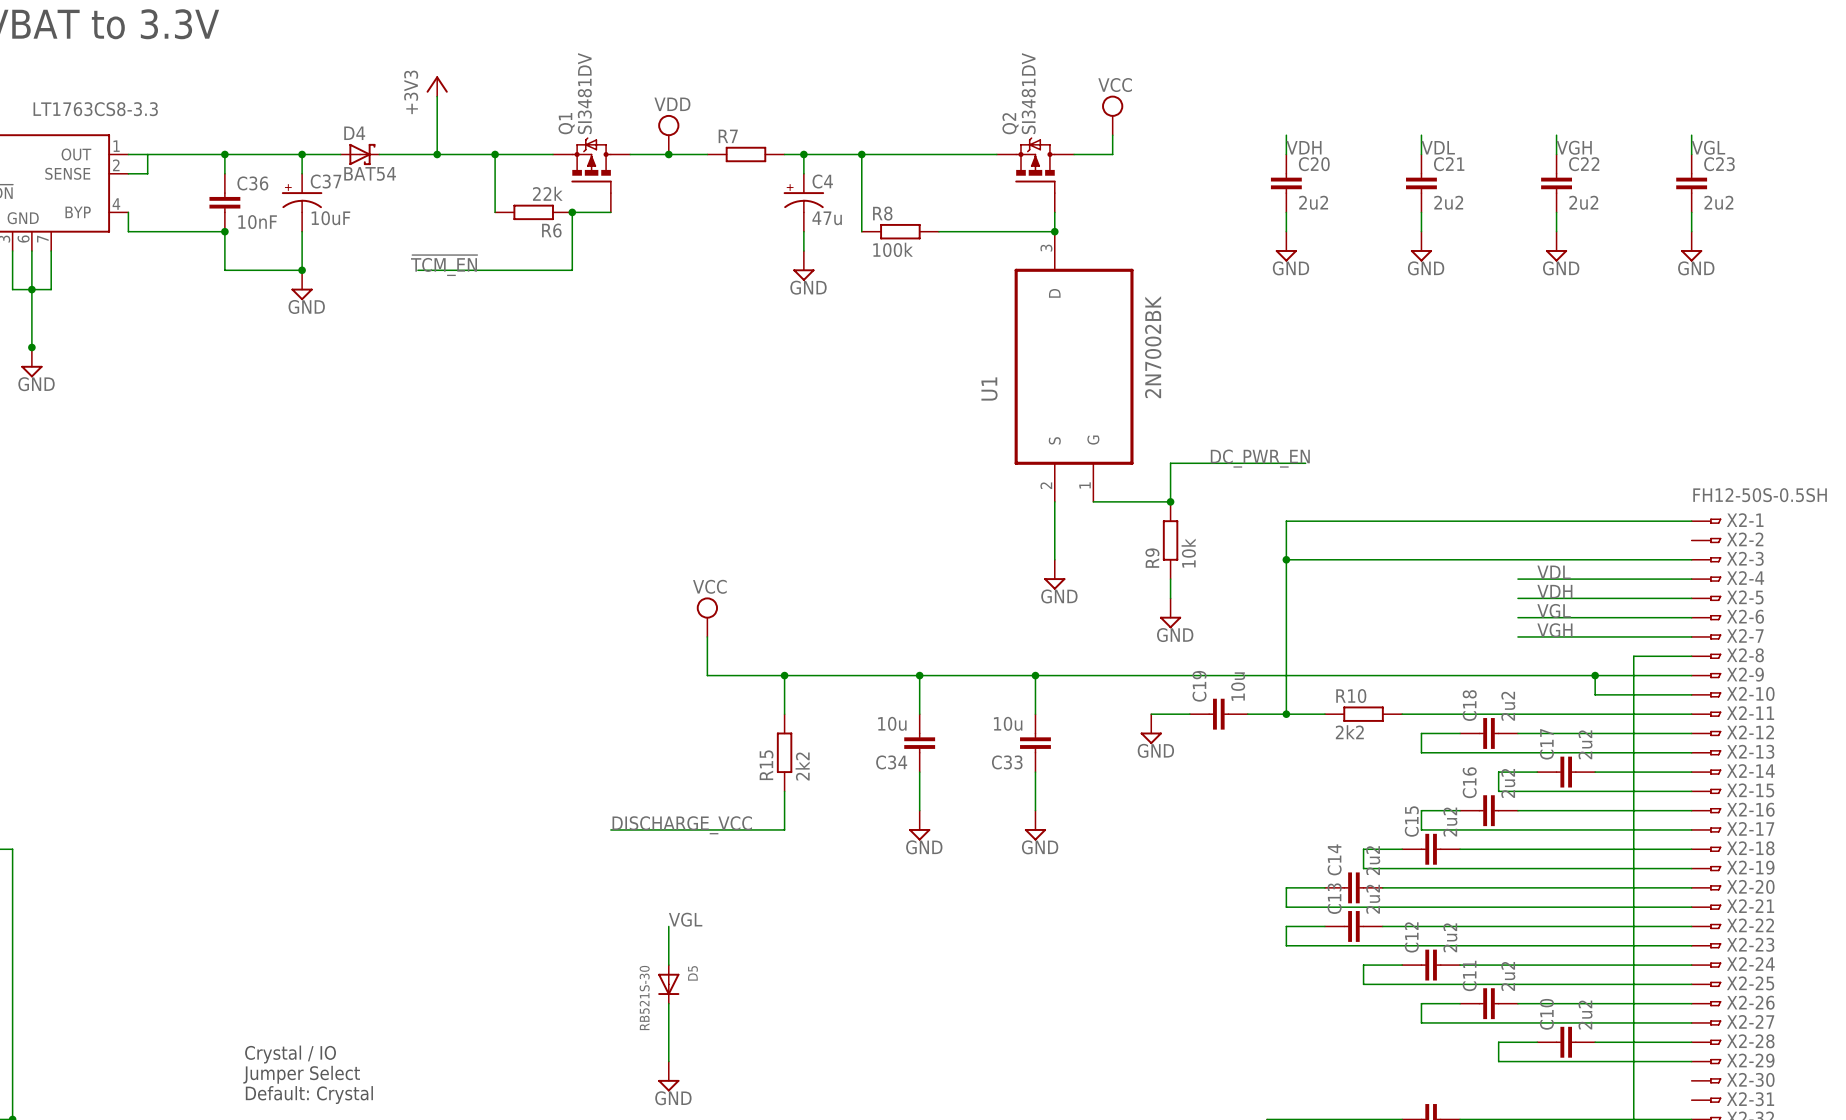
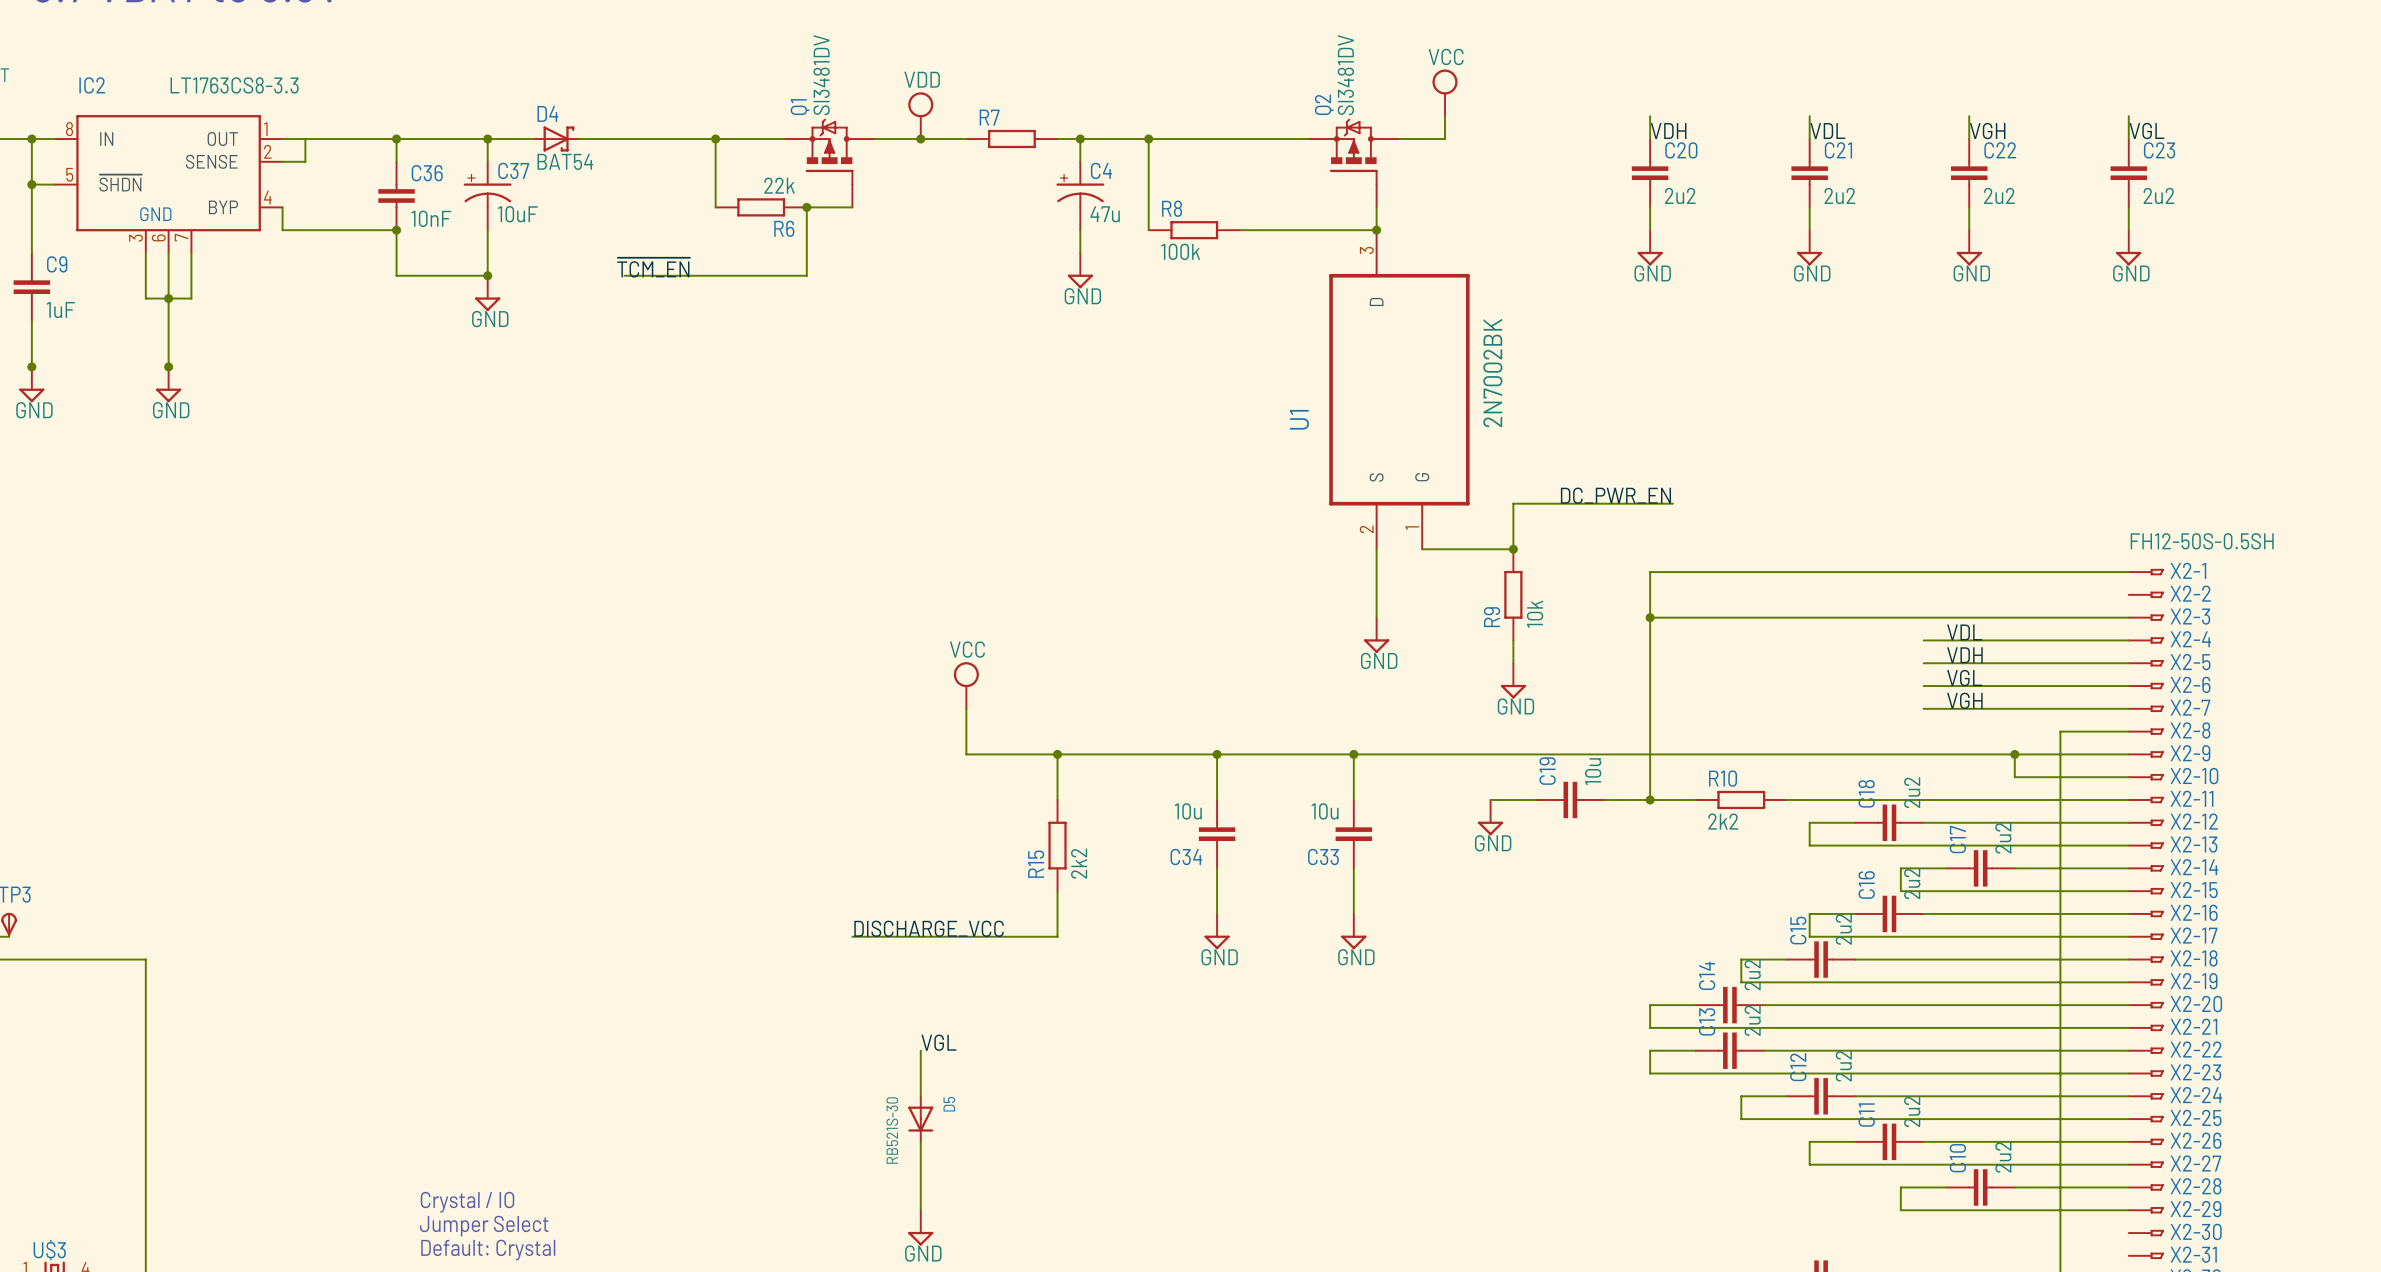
power symbol: +3V3 (437, 86) -> none
wire: (437, 96) (437, 154) -> none
junction: (437, 154) -> none

